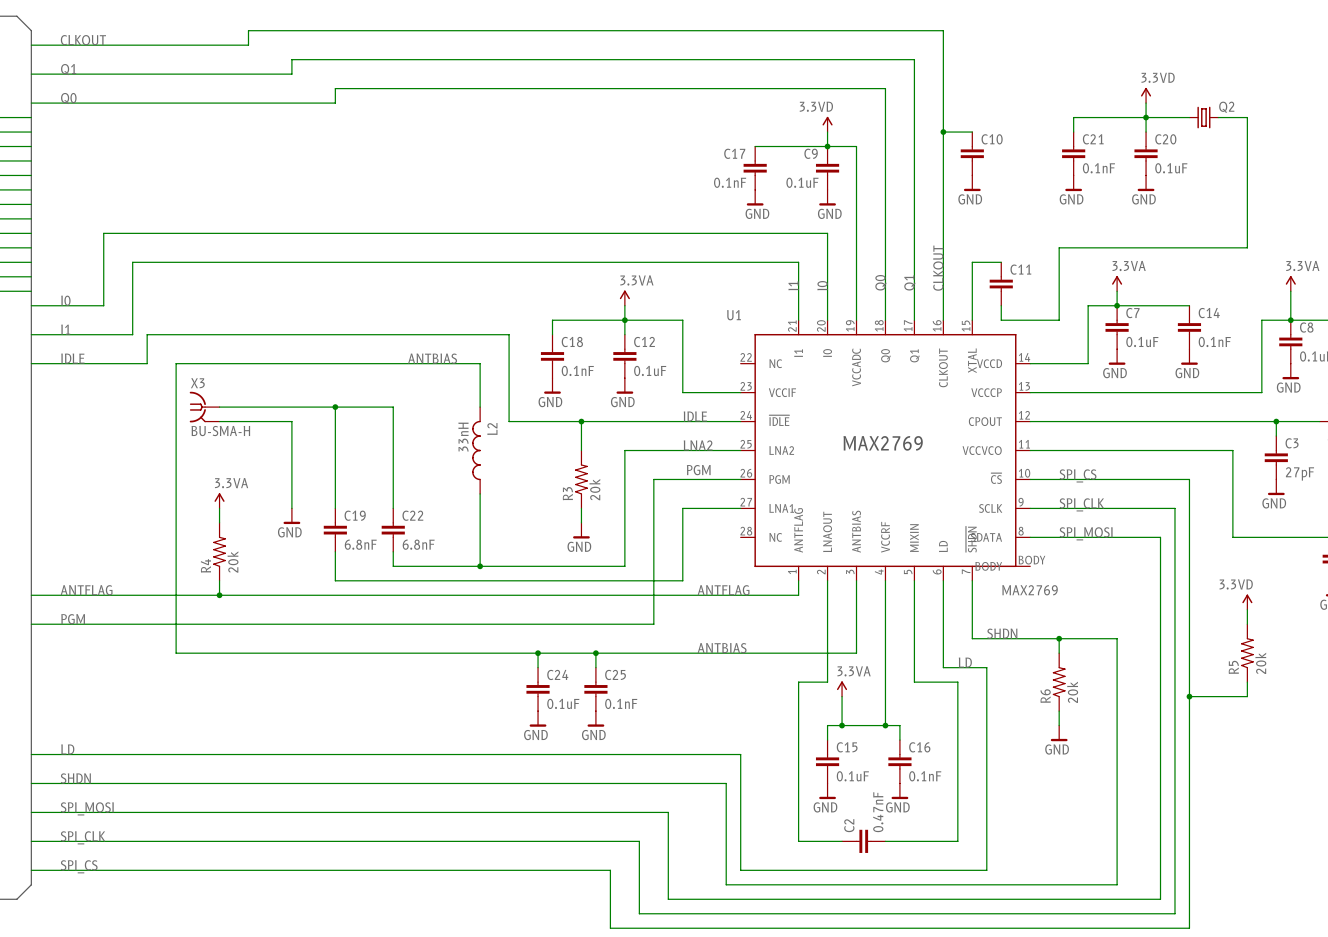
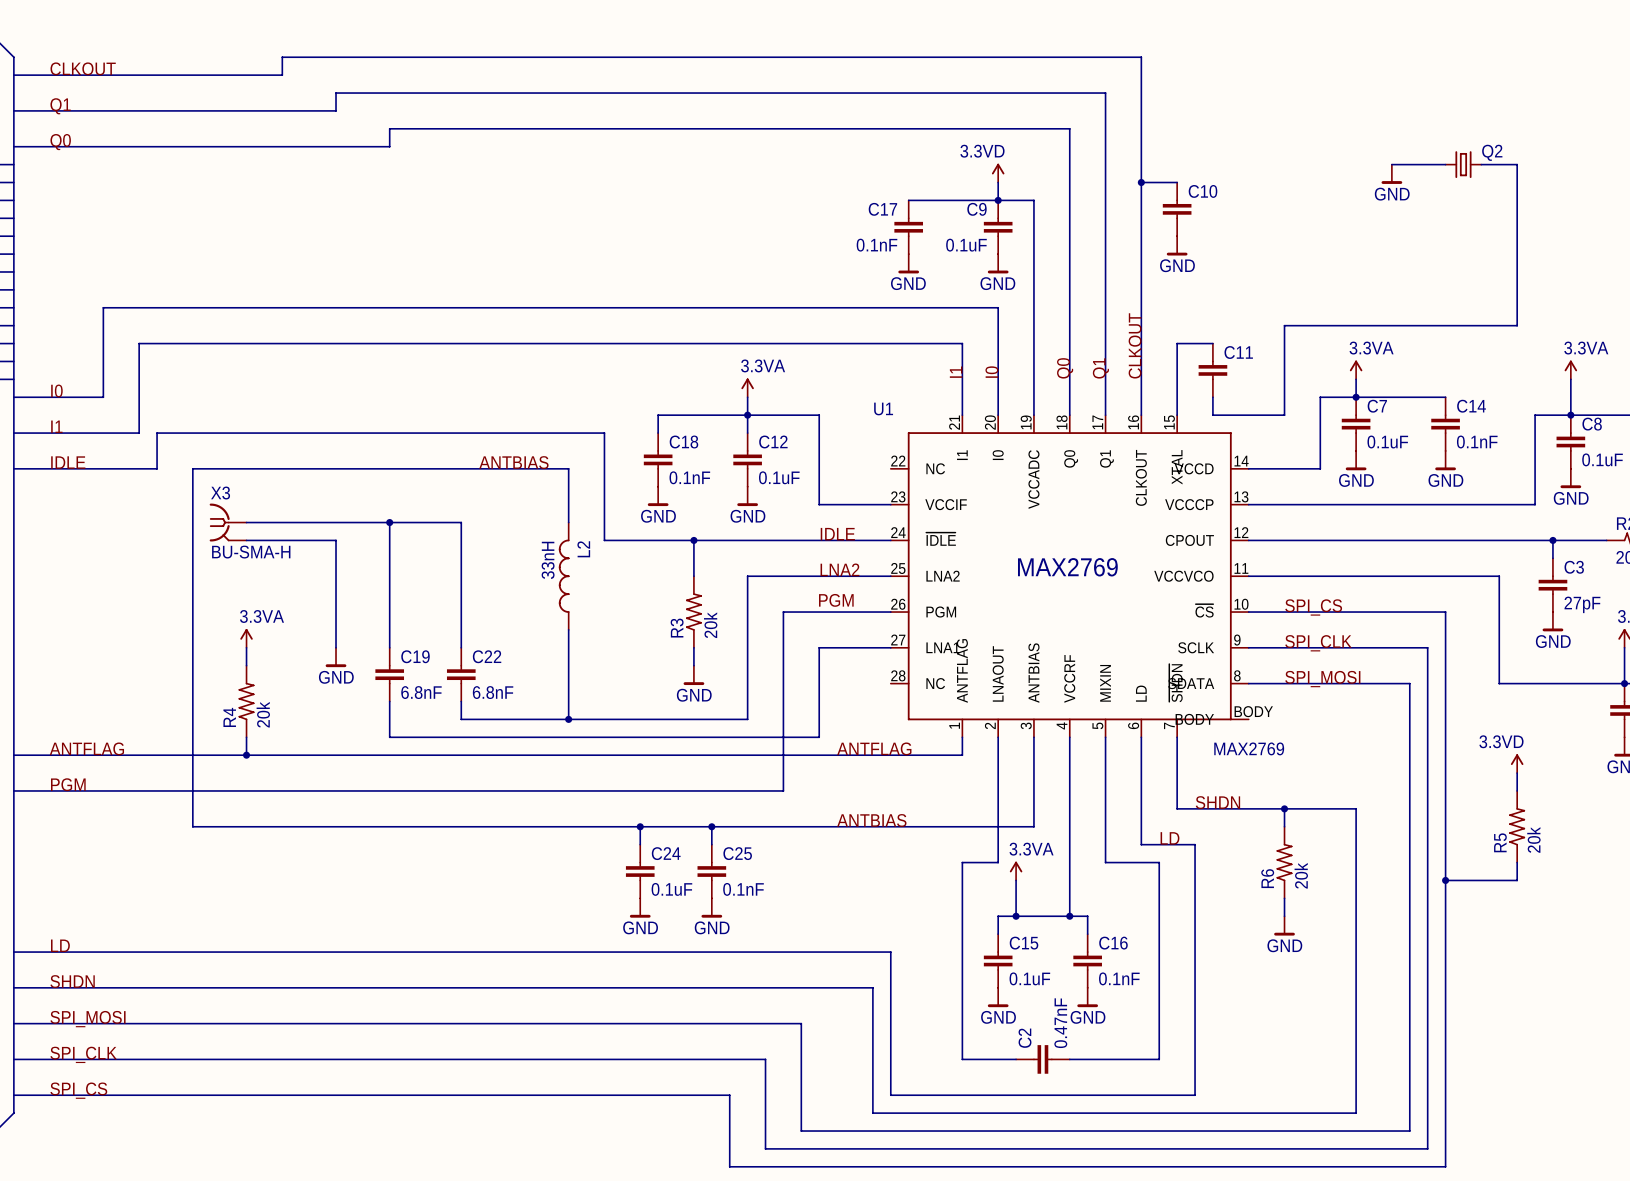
power symbol: 3.3VD (1146, 95) -> none
wire: (1146, 103) (1146, 132) -> none
wire: (1146, 117) (1073, 117) (1073, 132) -> none
junction: (1146, 117) -> none
power symbol: none -> GND (1391, 174)
C21: 0.1nF (1073, 153) -> none
C20: 0.1uF (1146, 153) -> none
power symbol: GND (1073, 183) -> none
power symbol: GND (1146, 183) -> none

